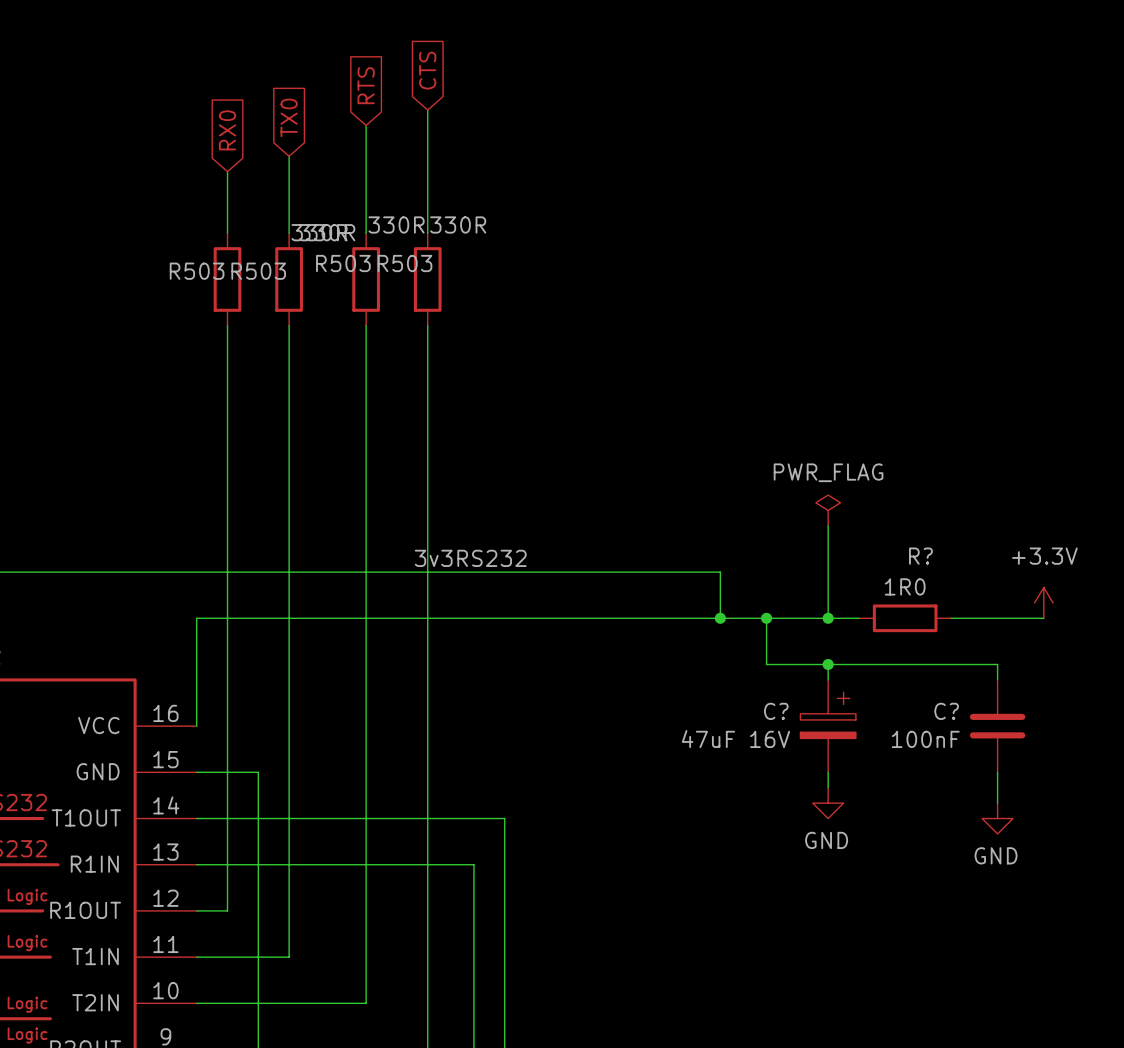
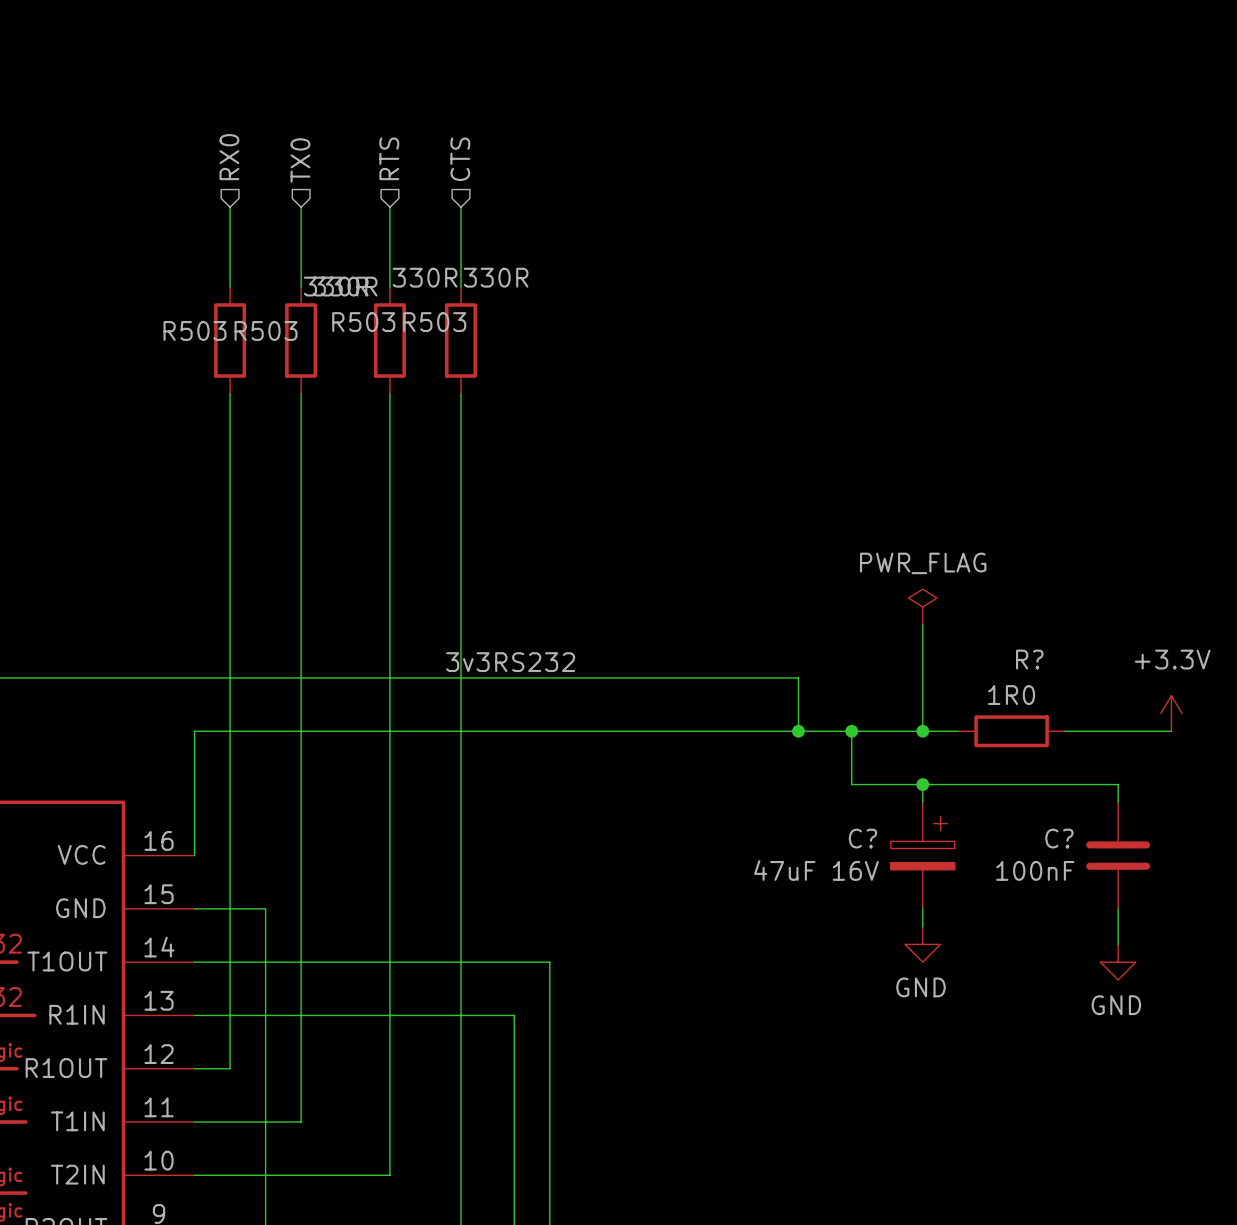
global label: CTS (427, 70) -> none
global label: RTS (366, 85) -> none
wire: (427, 110) (427, 163) -> none
global label: TX0 (289, 117) -> none
hierarchical label: none -> RX0 (229, 157)
hierarchical label: none -> RTS (389, 158)
hierarchical label: none -> CTS (460, 159)
hierarchical label: none -> TX0 (300, 160)
wire: (366, 125) (366, 163) -> none
global label: RX0 (227, 130) -> none
wire: (289, 156) (289, 163) -> (230, 207) (230, 216)

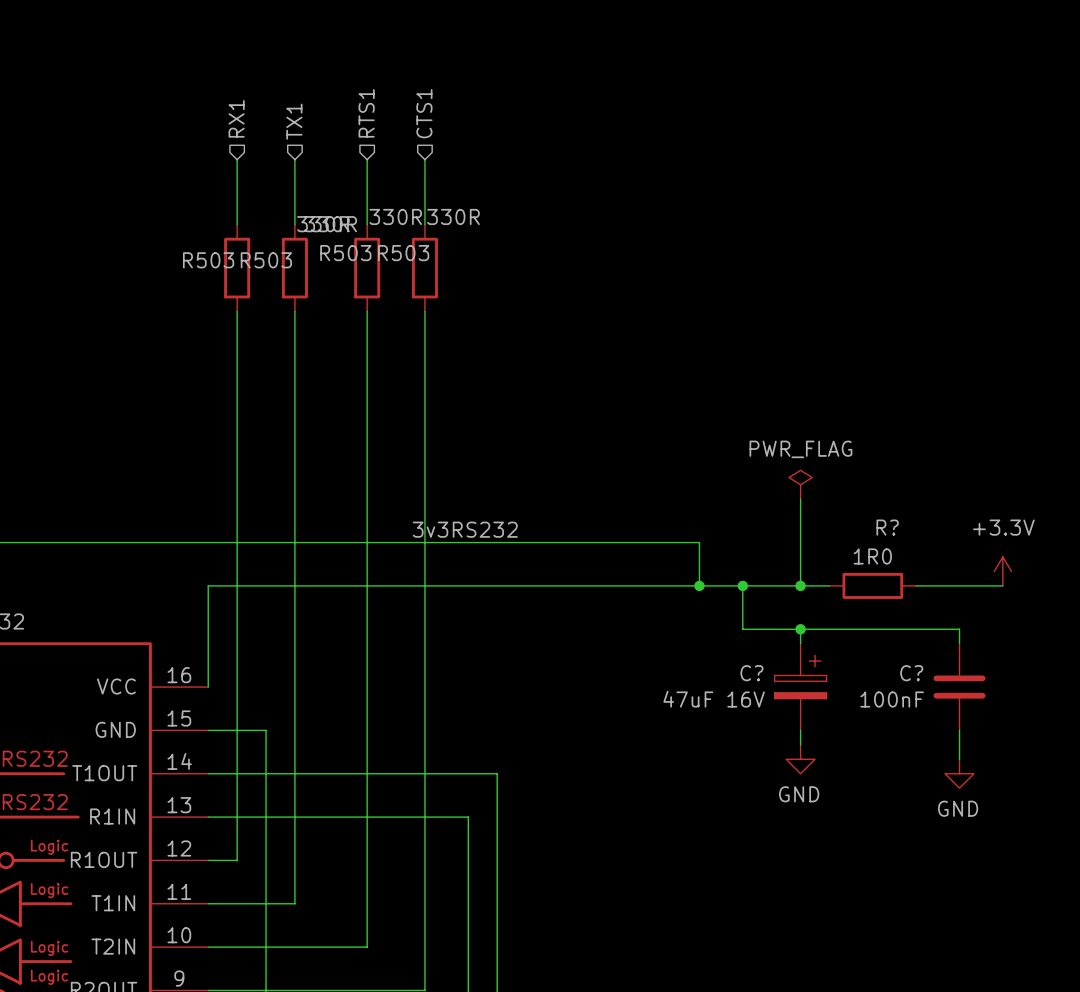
hierarchical label: RX0 (229, 157) -> RX1 (236, 118)
hierarchical label: RTS (389, 158) -> RTS1 (366, 113)
hierarchical label: CTS (460, 159) -> CTS1 (424, 113)
hierarchical label: TX0 (300, 160) -> TX1 (294, 121)

